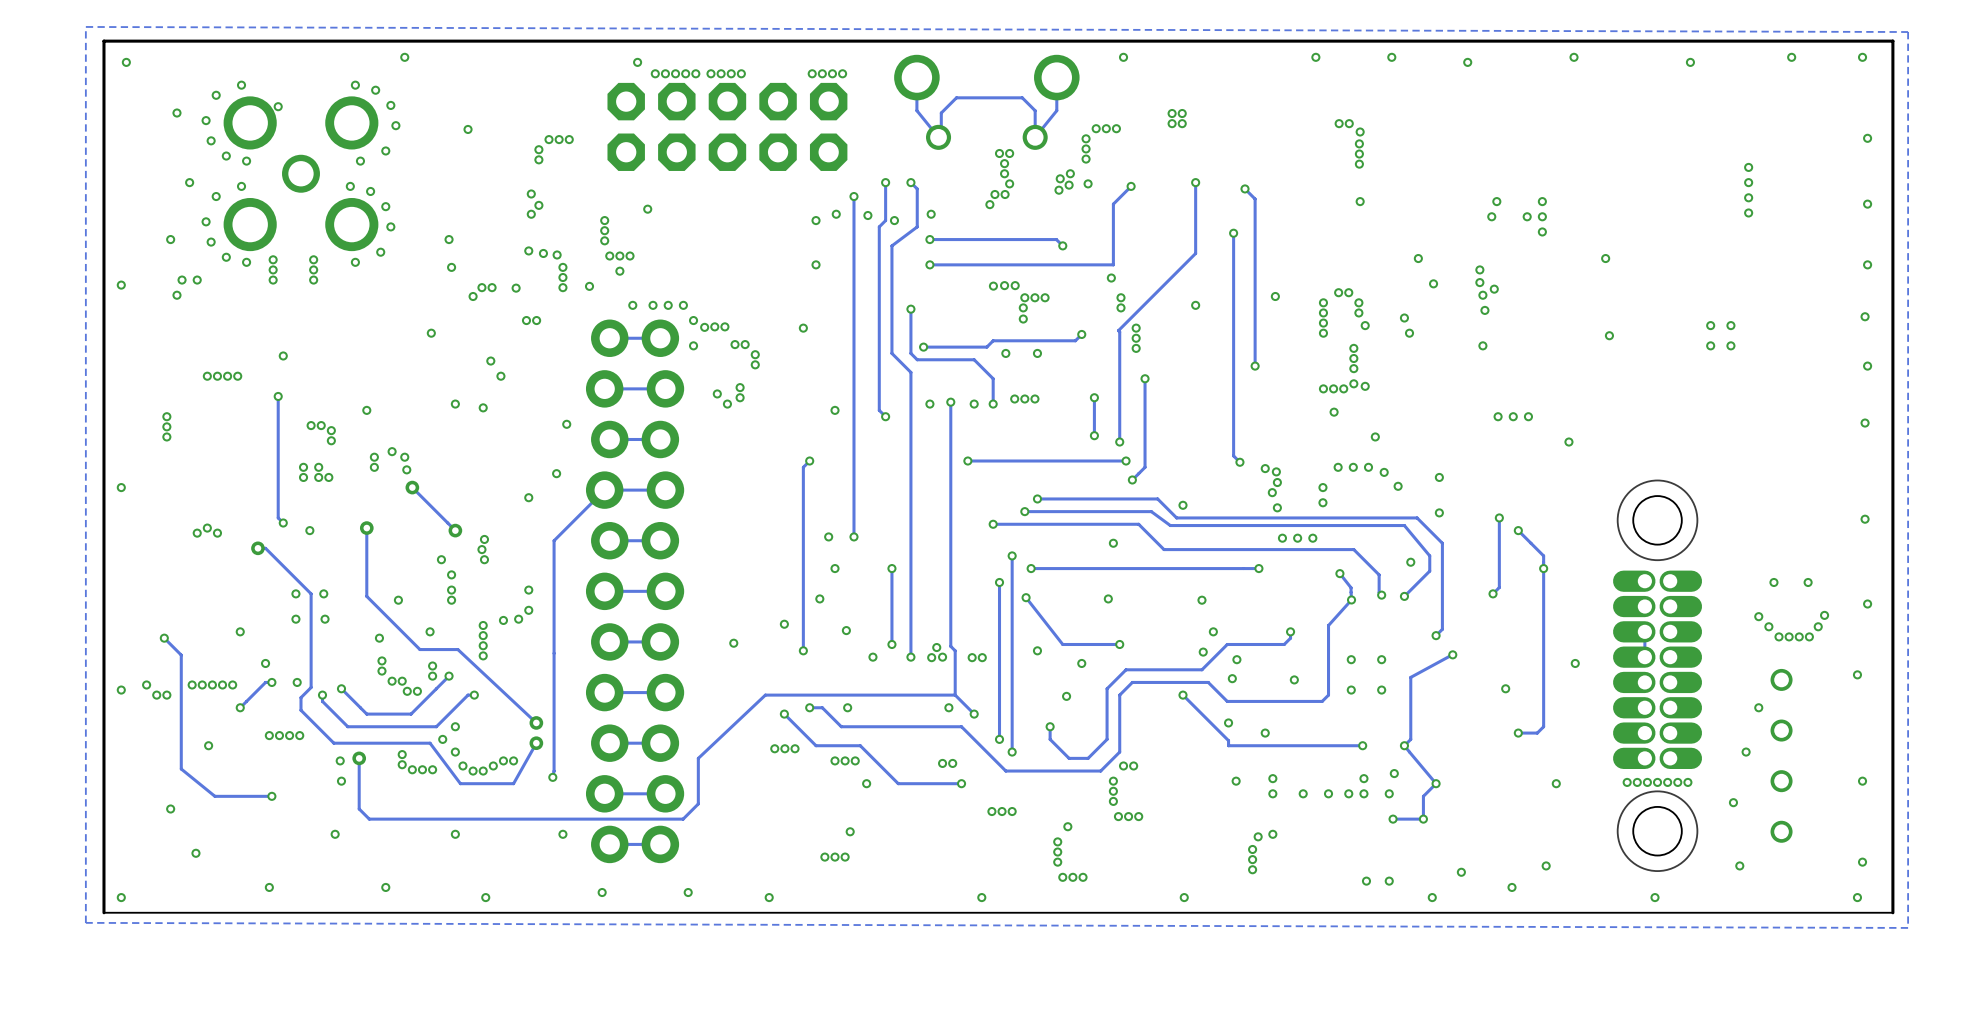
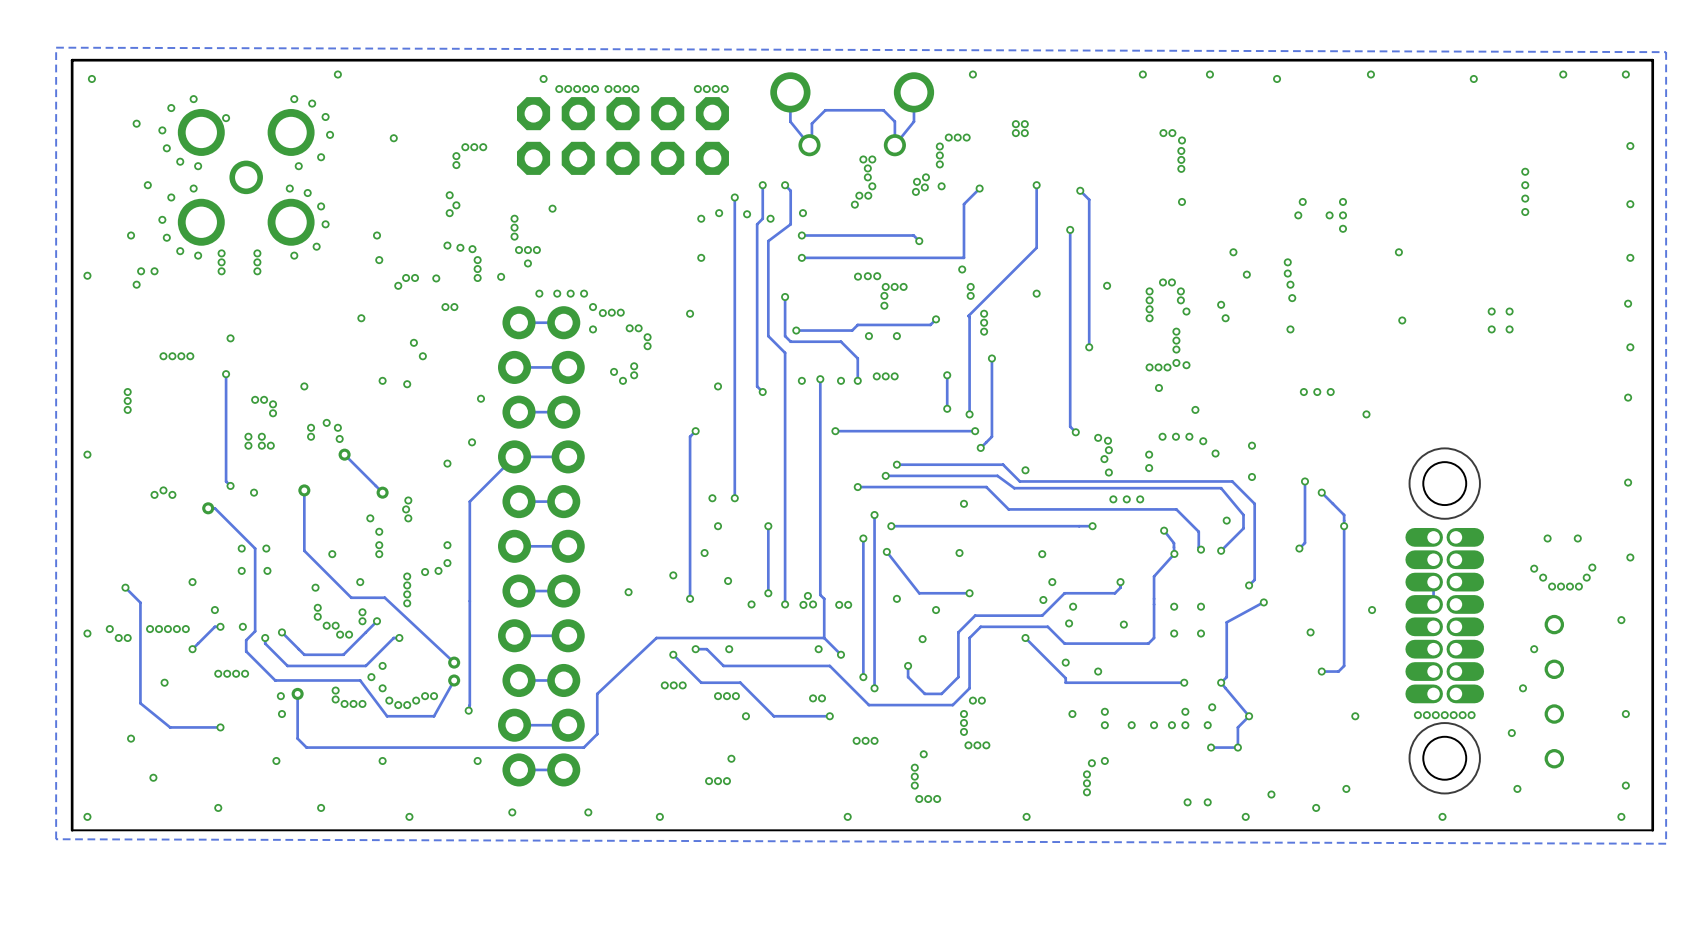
via: (1494, 289) -> none

